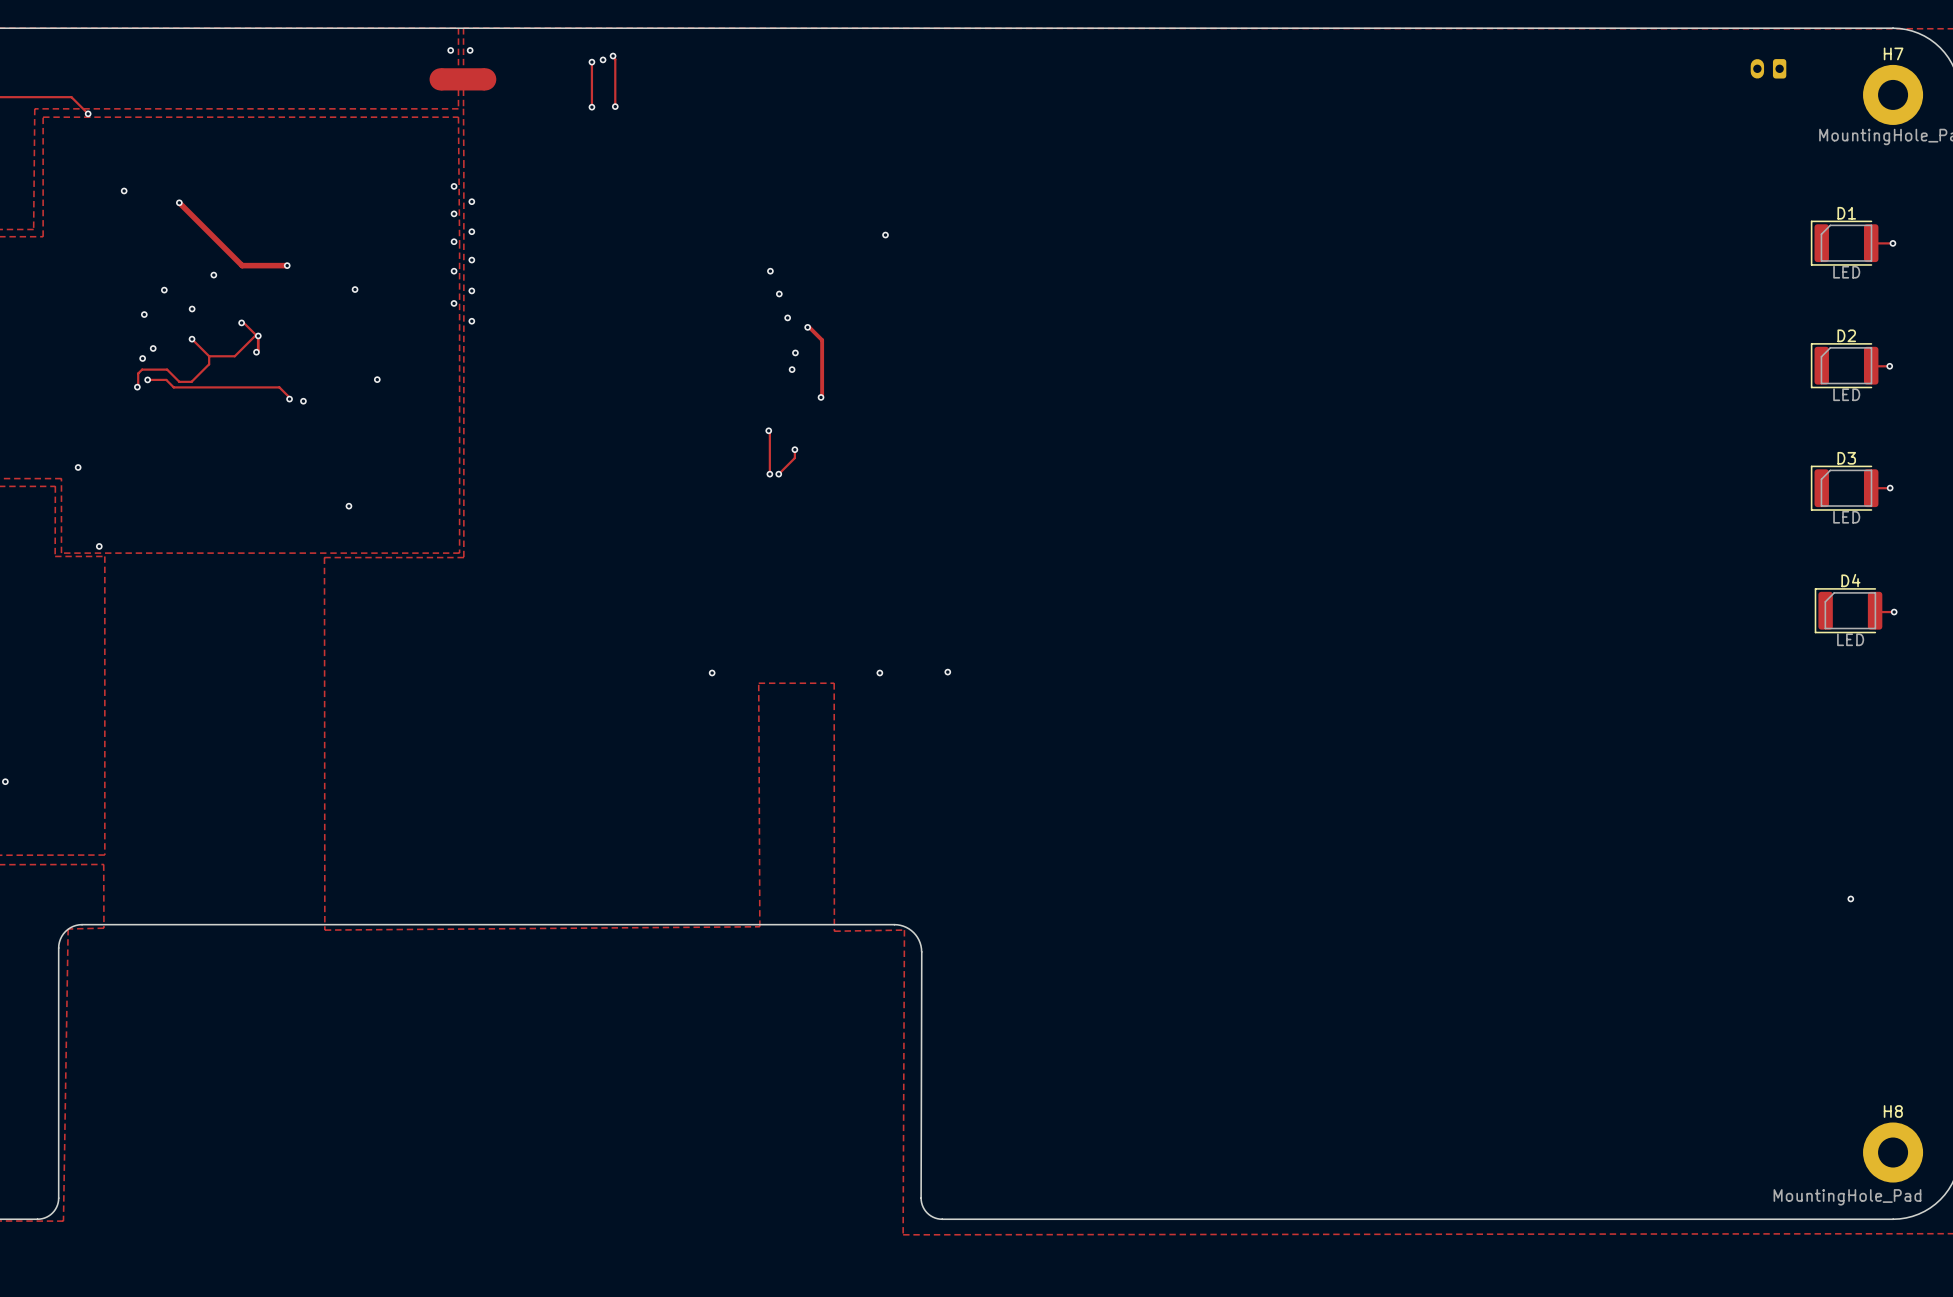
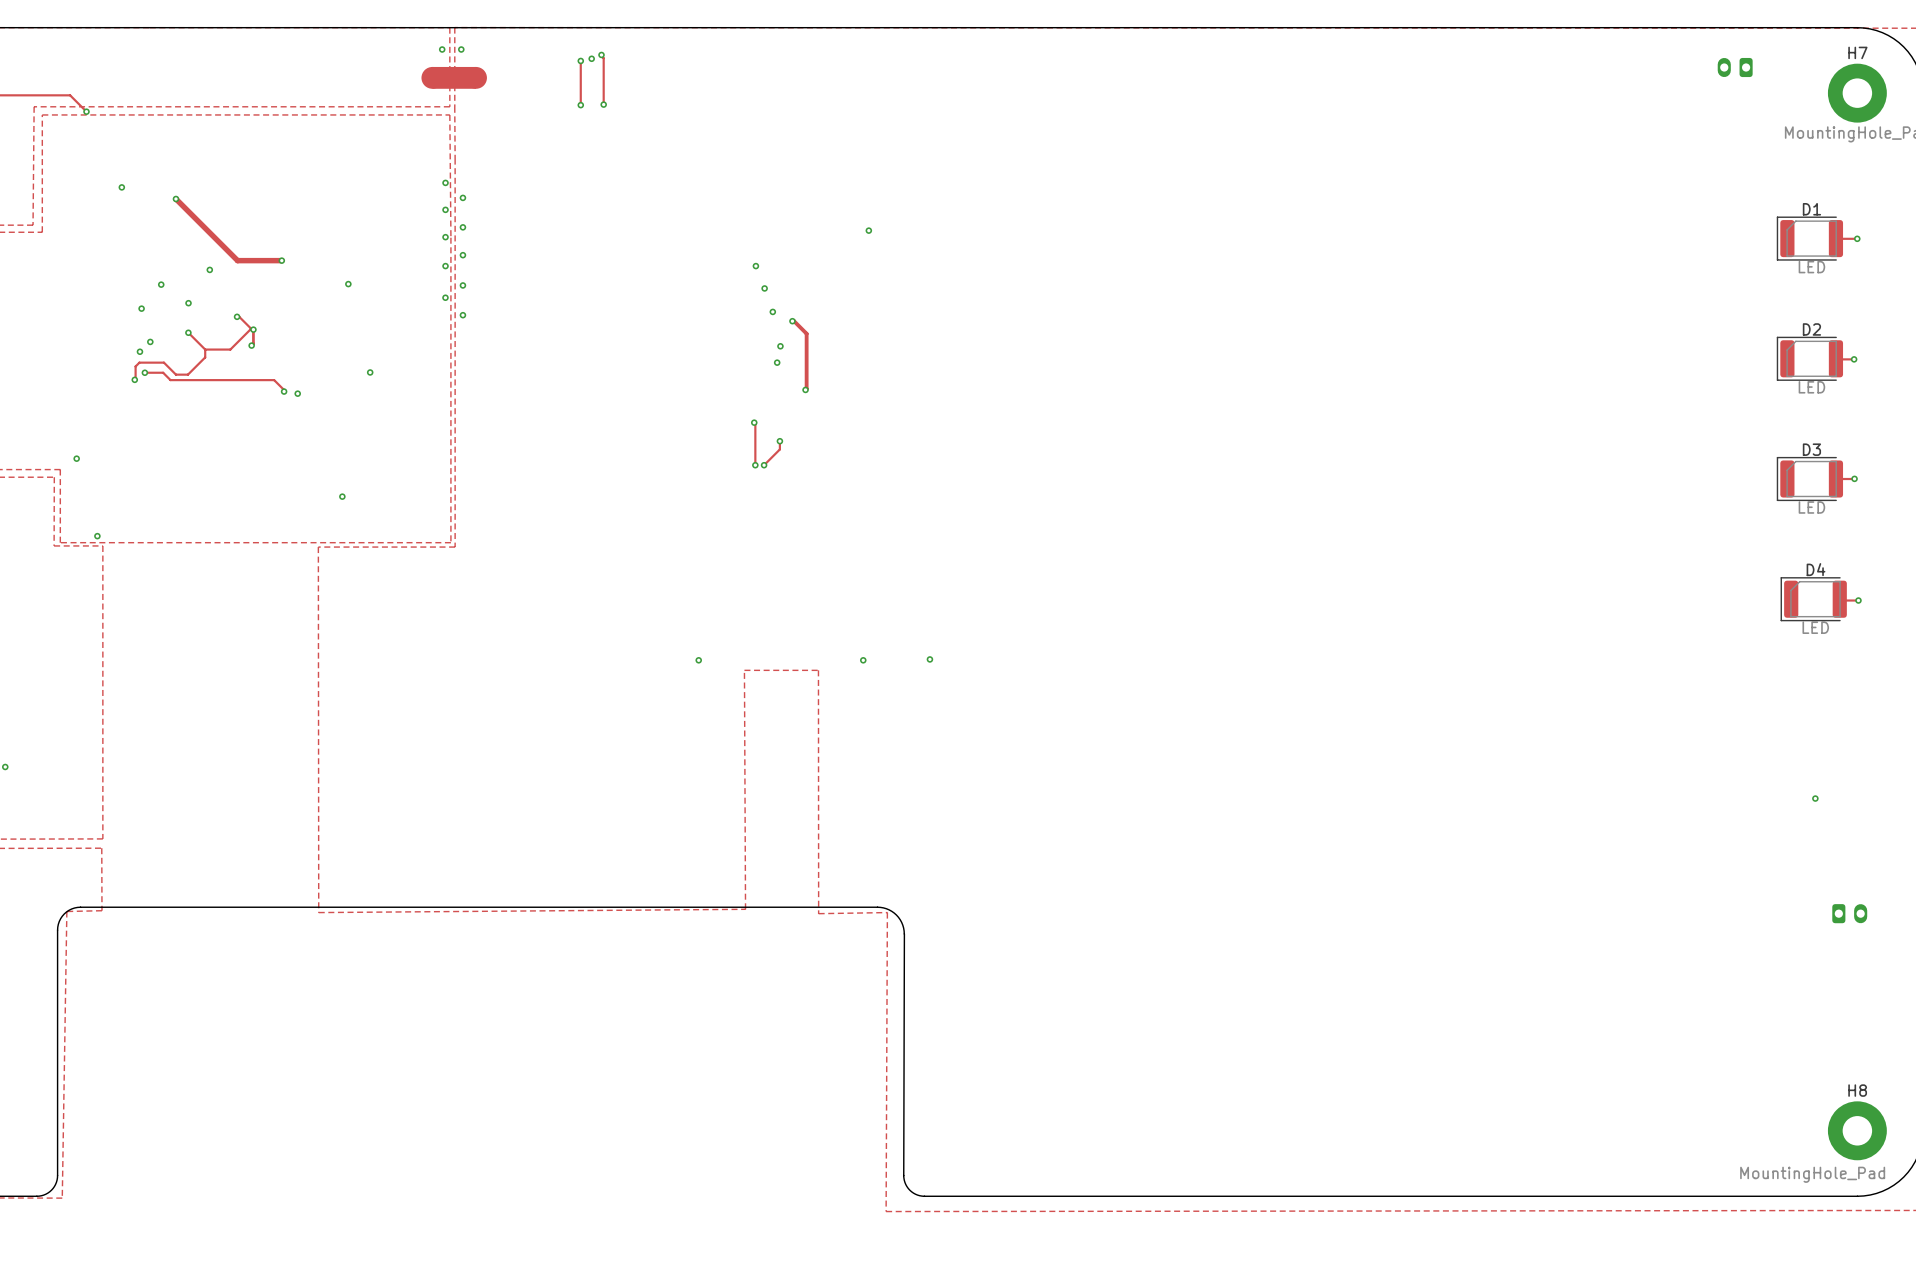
via: none -> (1815, 798)
via: (1850, 898) -> none
part: none -> (1849, 913)

